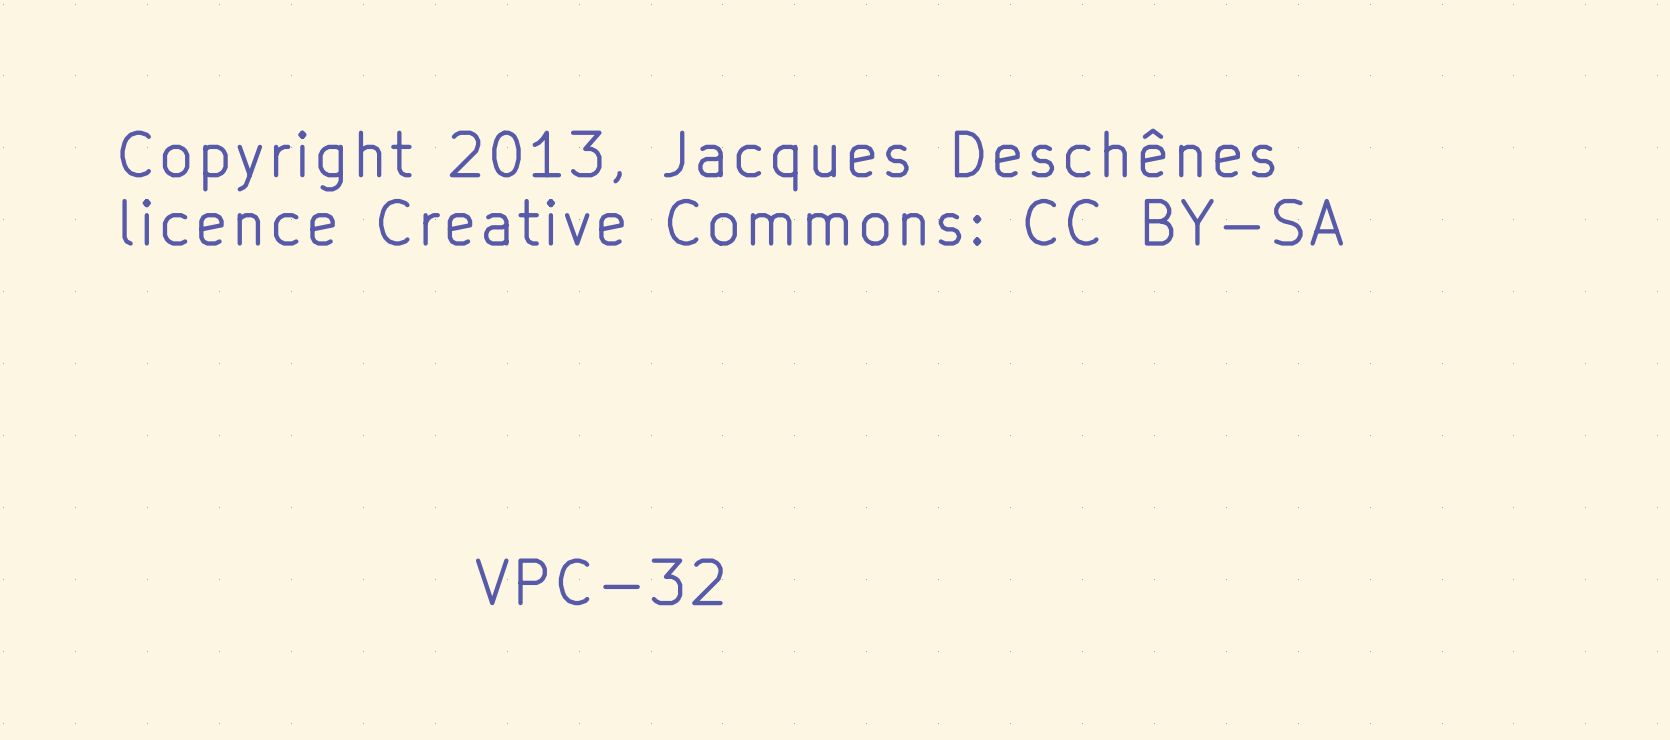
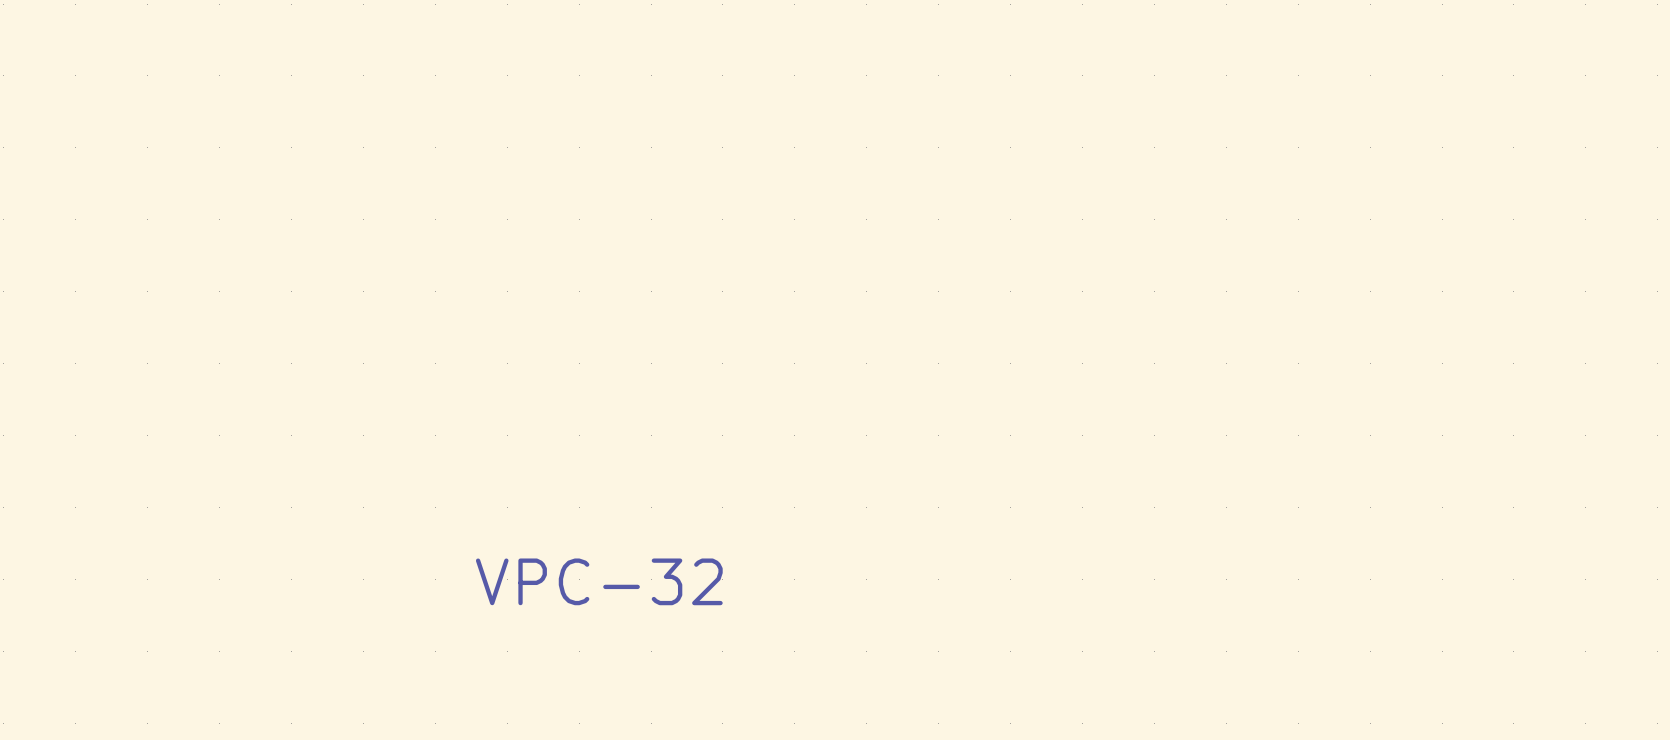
text: Copyright 2013, Jacques Deschênes (697, 160) -> none
text: licence Creative Commons: CC BY-SA (732, 222) -> none

